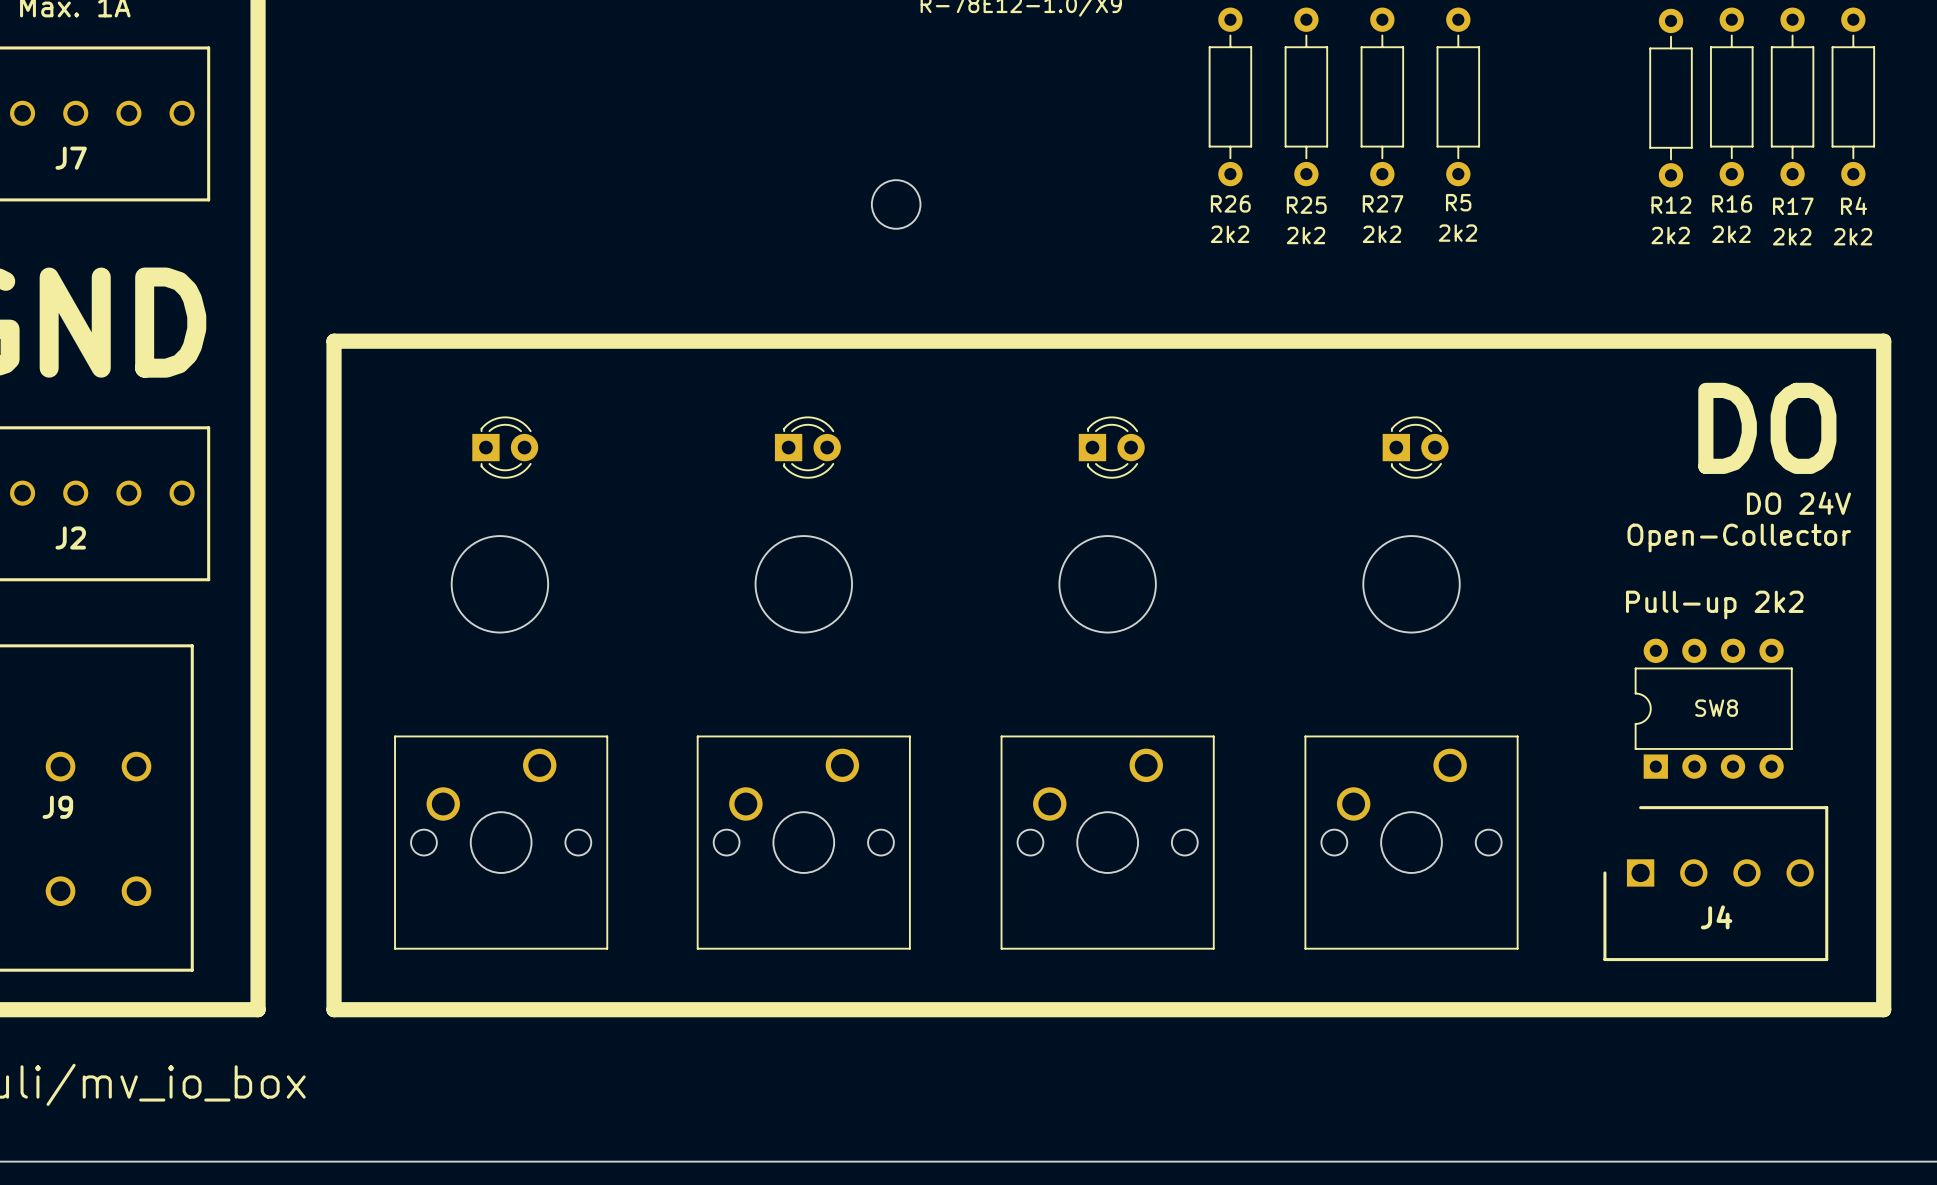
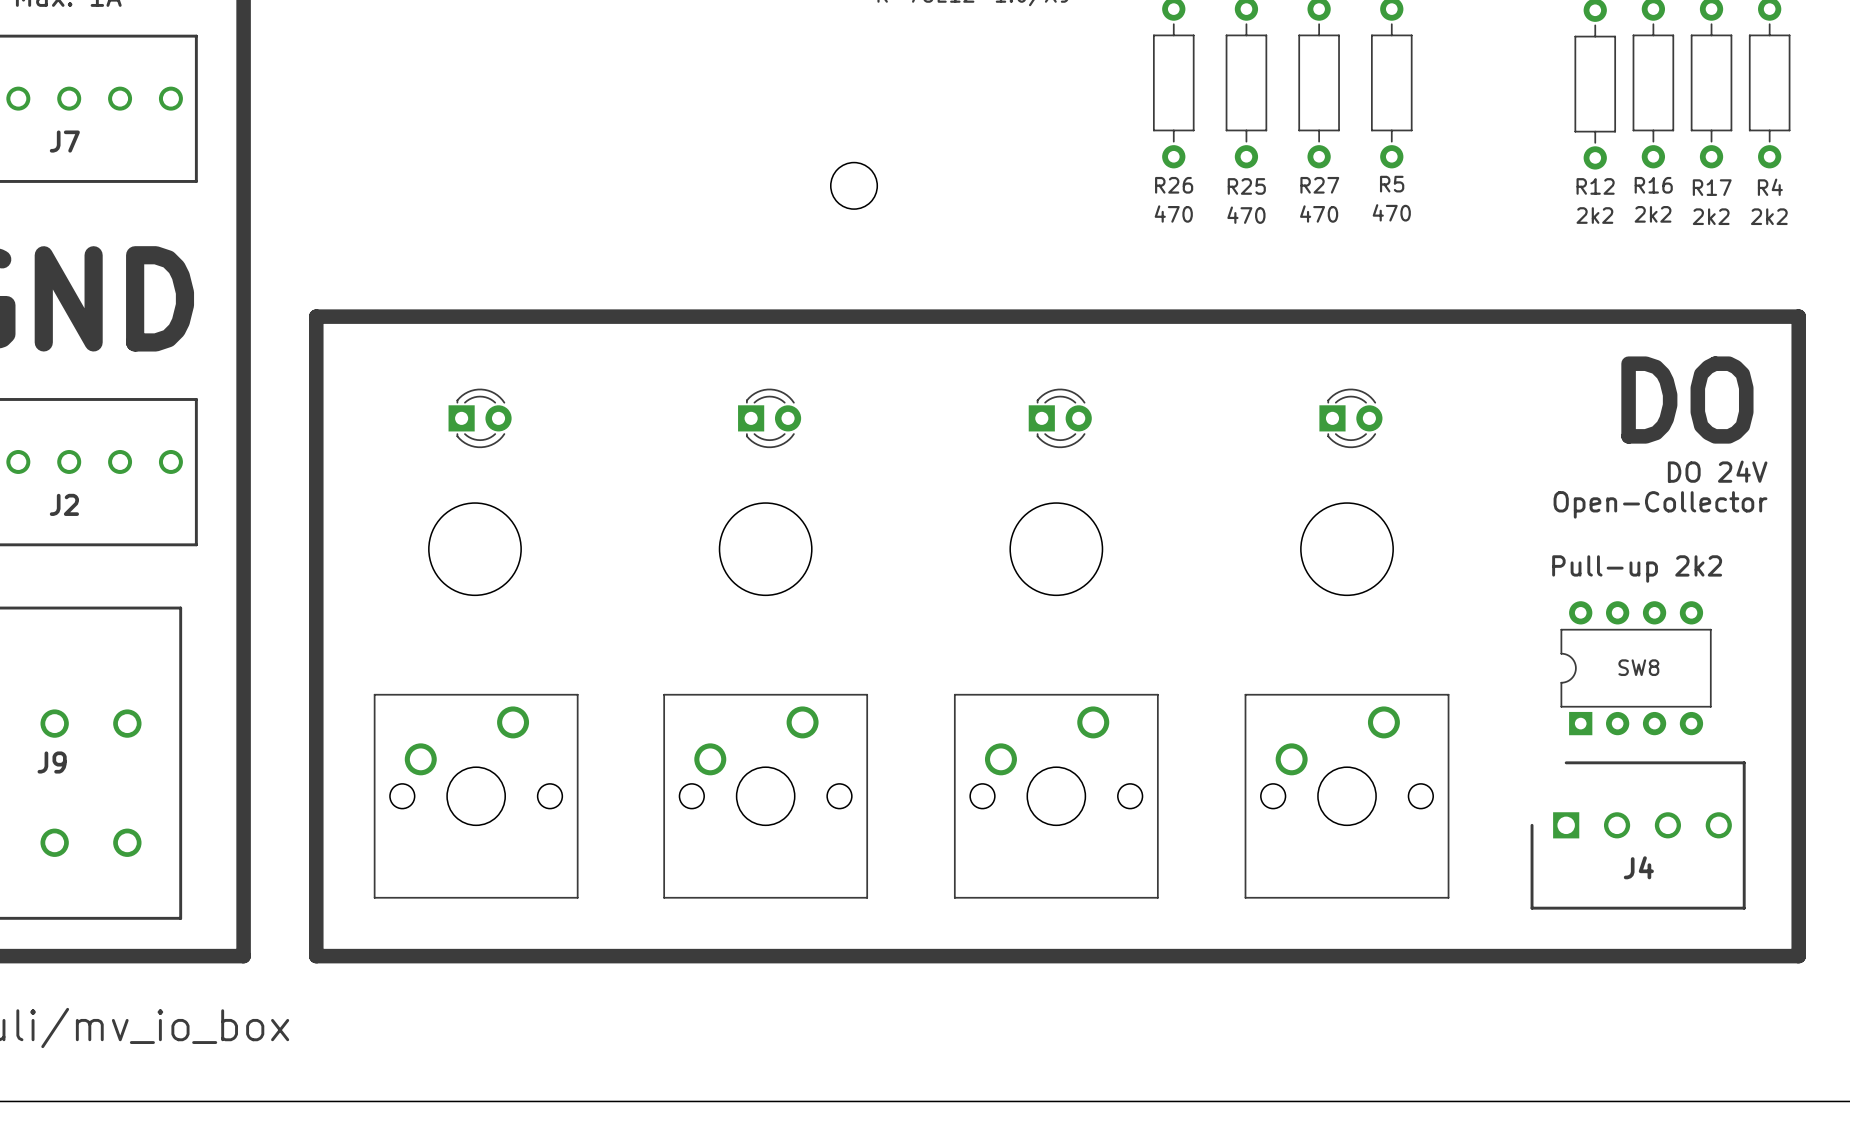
R5 value: 2k2 (1457, 233) -> 470 (1391, 212)
R26 value: 2k2 (1230, 234) -> 470 (1173, 214)
R27 value: 2k2 (1381, 234) -> 470 (1319, 214)
R25 value: 2k2 (1306, 235) -> 470 (1246, 215)

